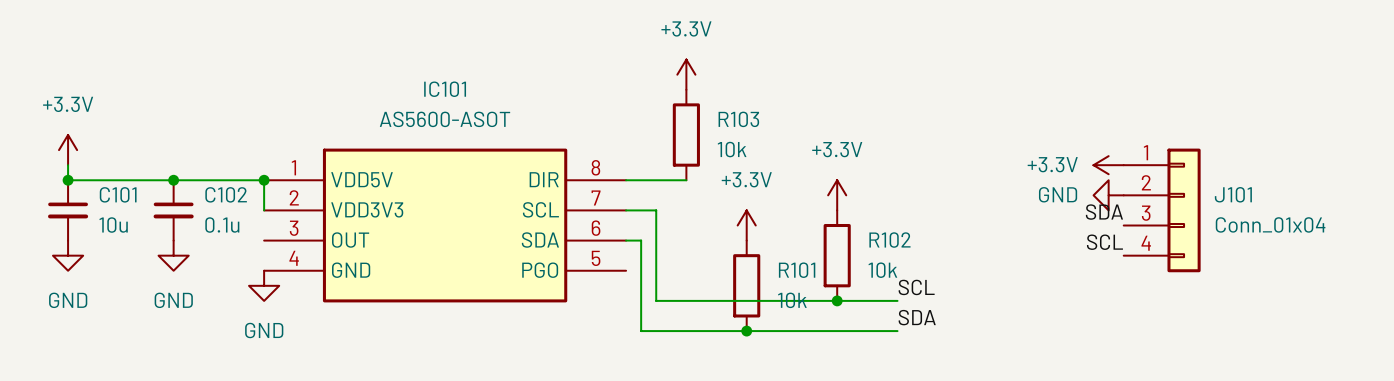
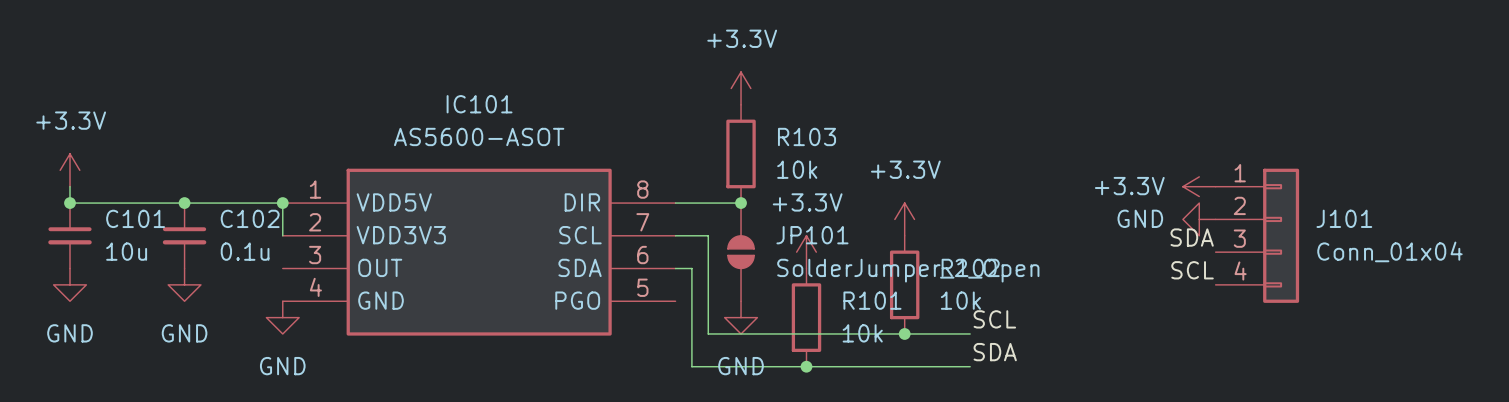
junction: none -> (741, 203)
JP101: none -> SolderJumper_2_Open (741, 252)
power symbol: none -> GND (741, 317)

